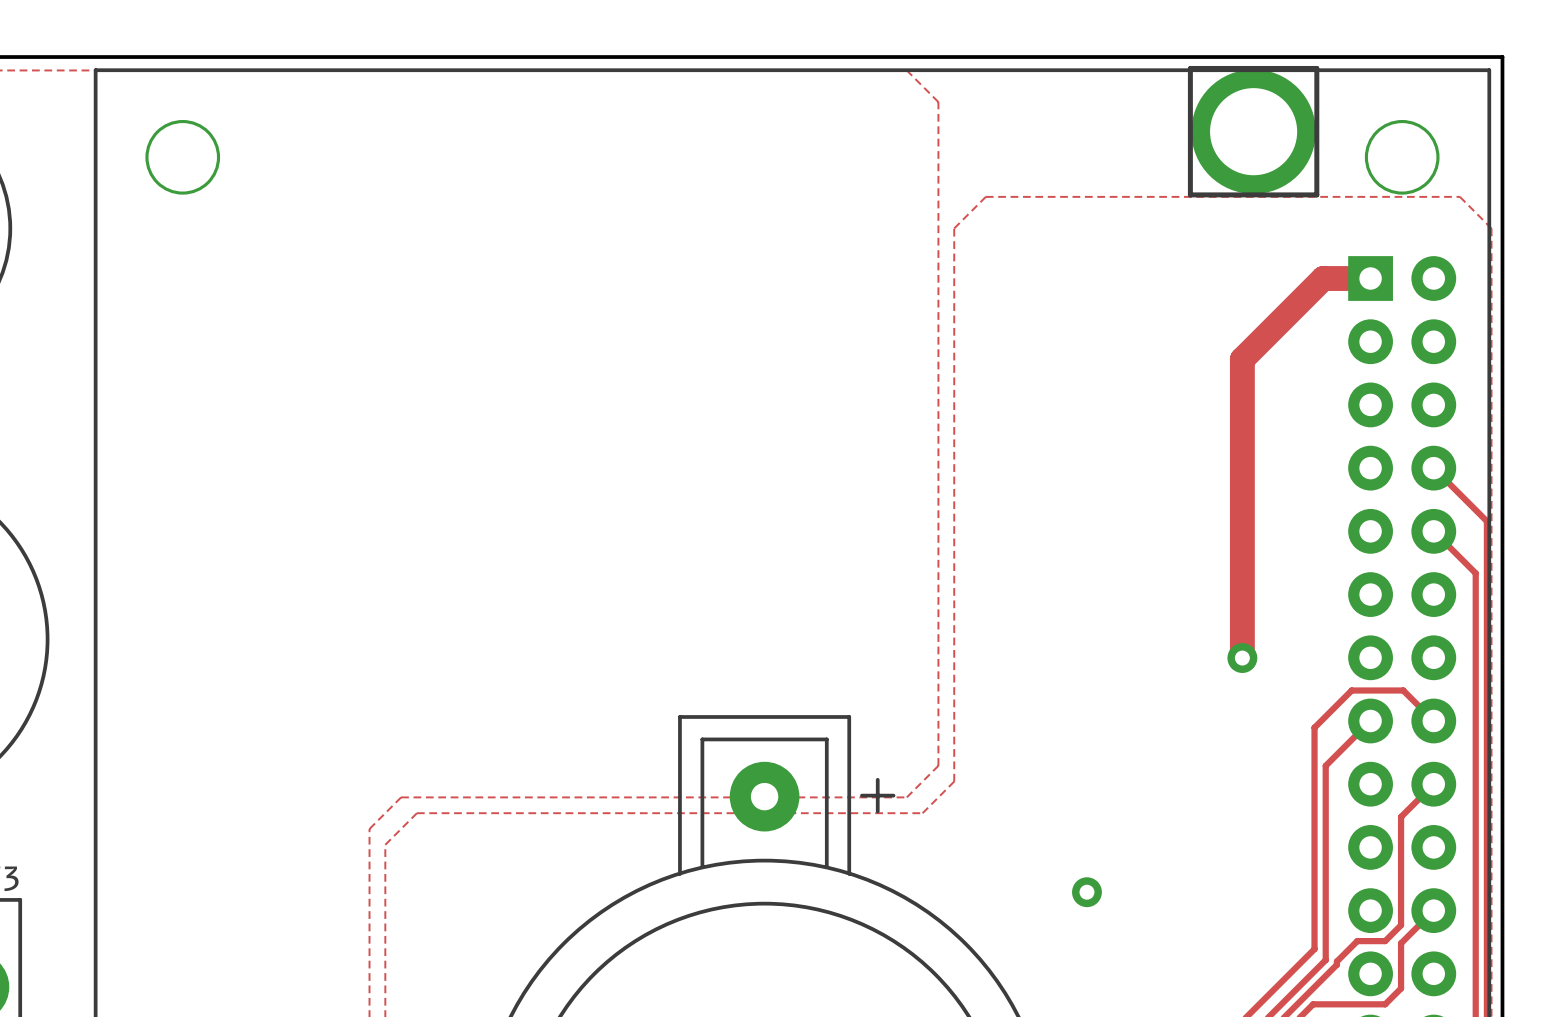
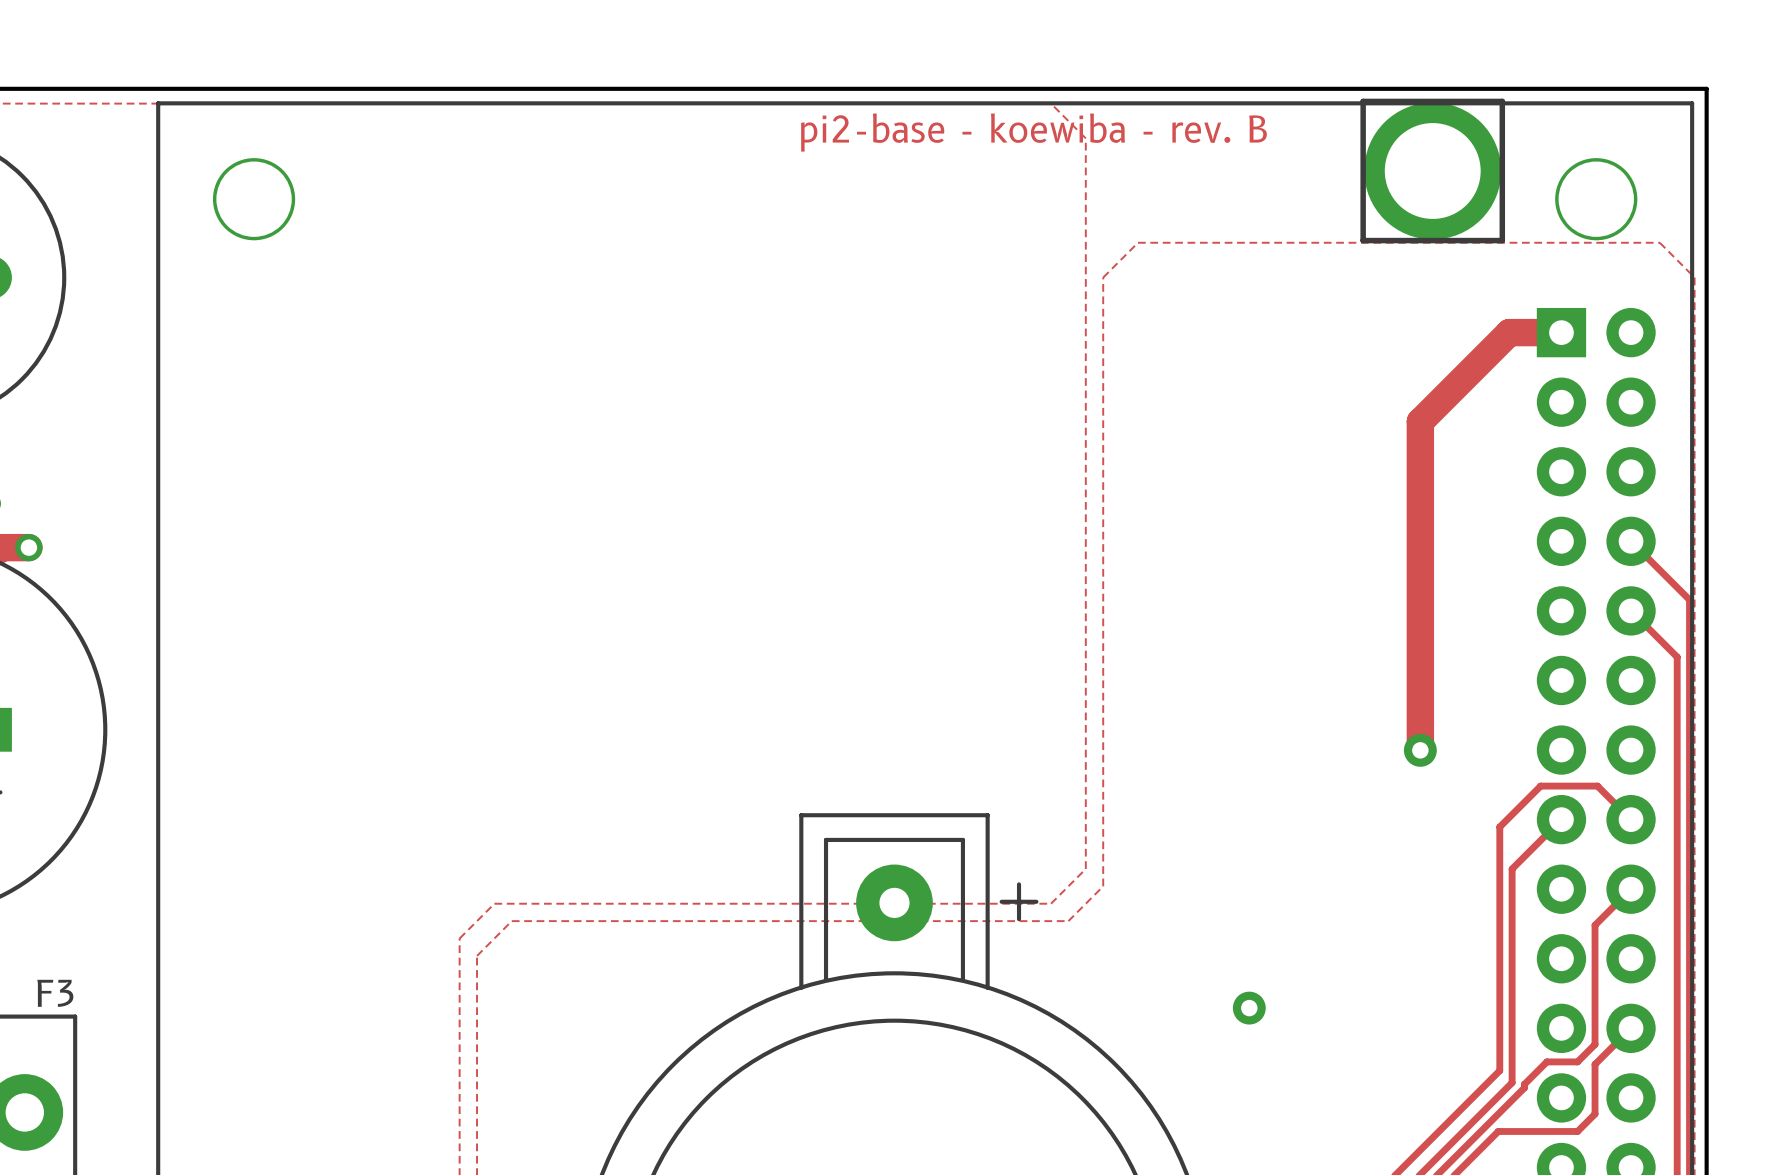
text: none -> pi2-base - koewiba - rev. B (1034, 132)

